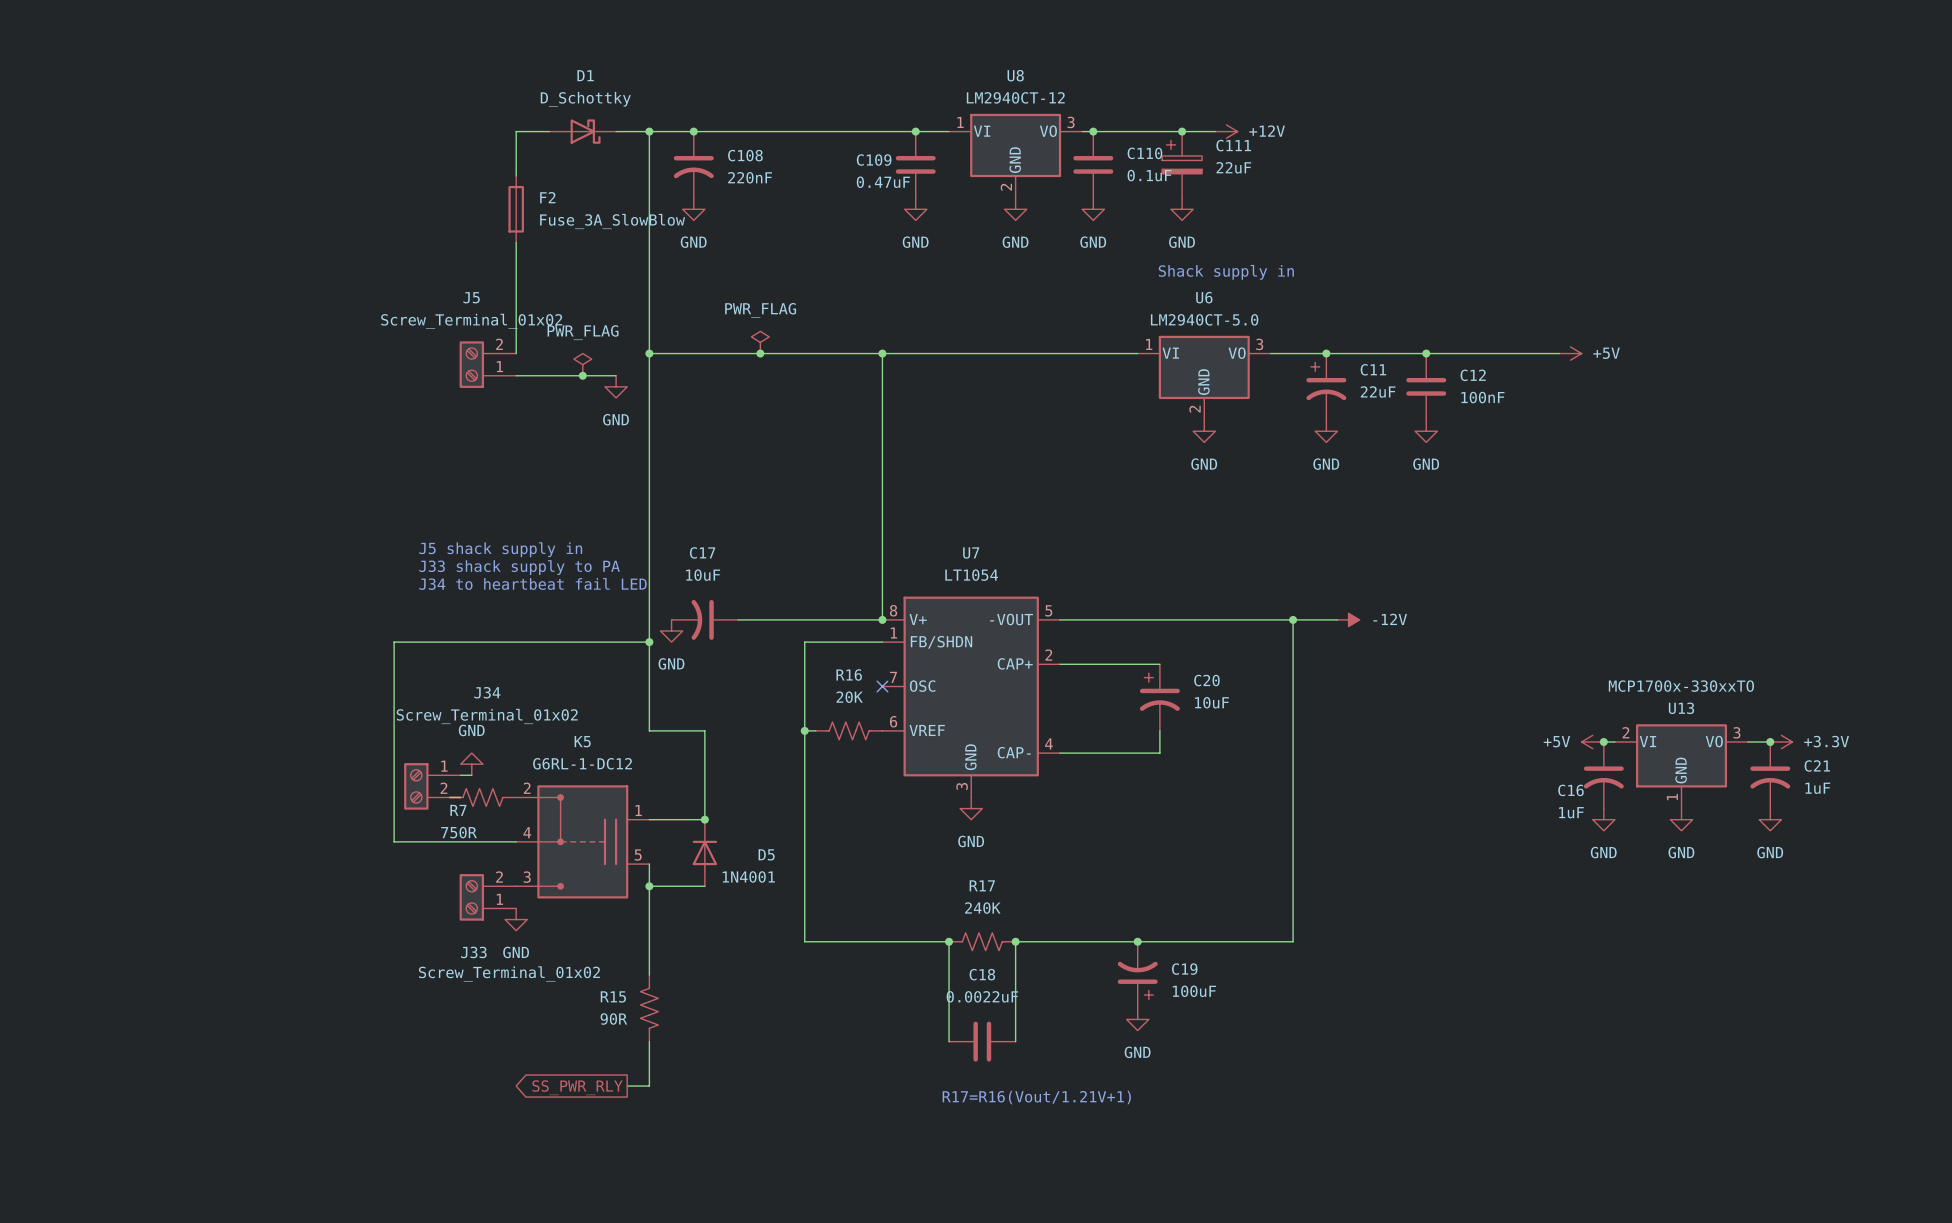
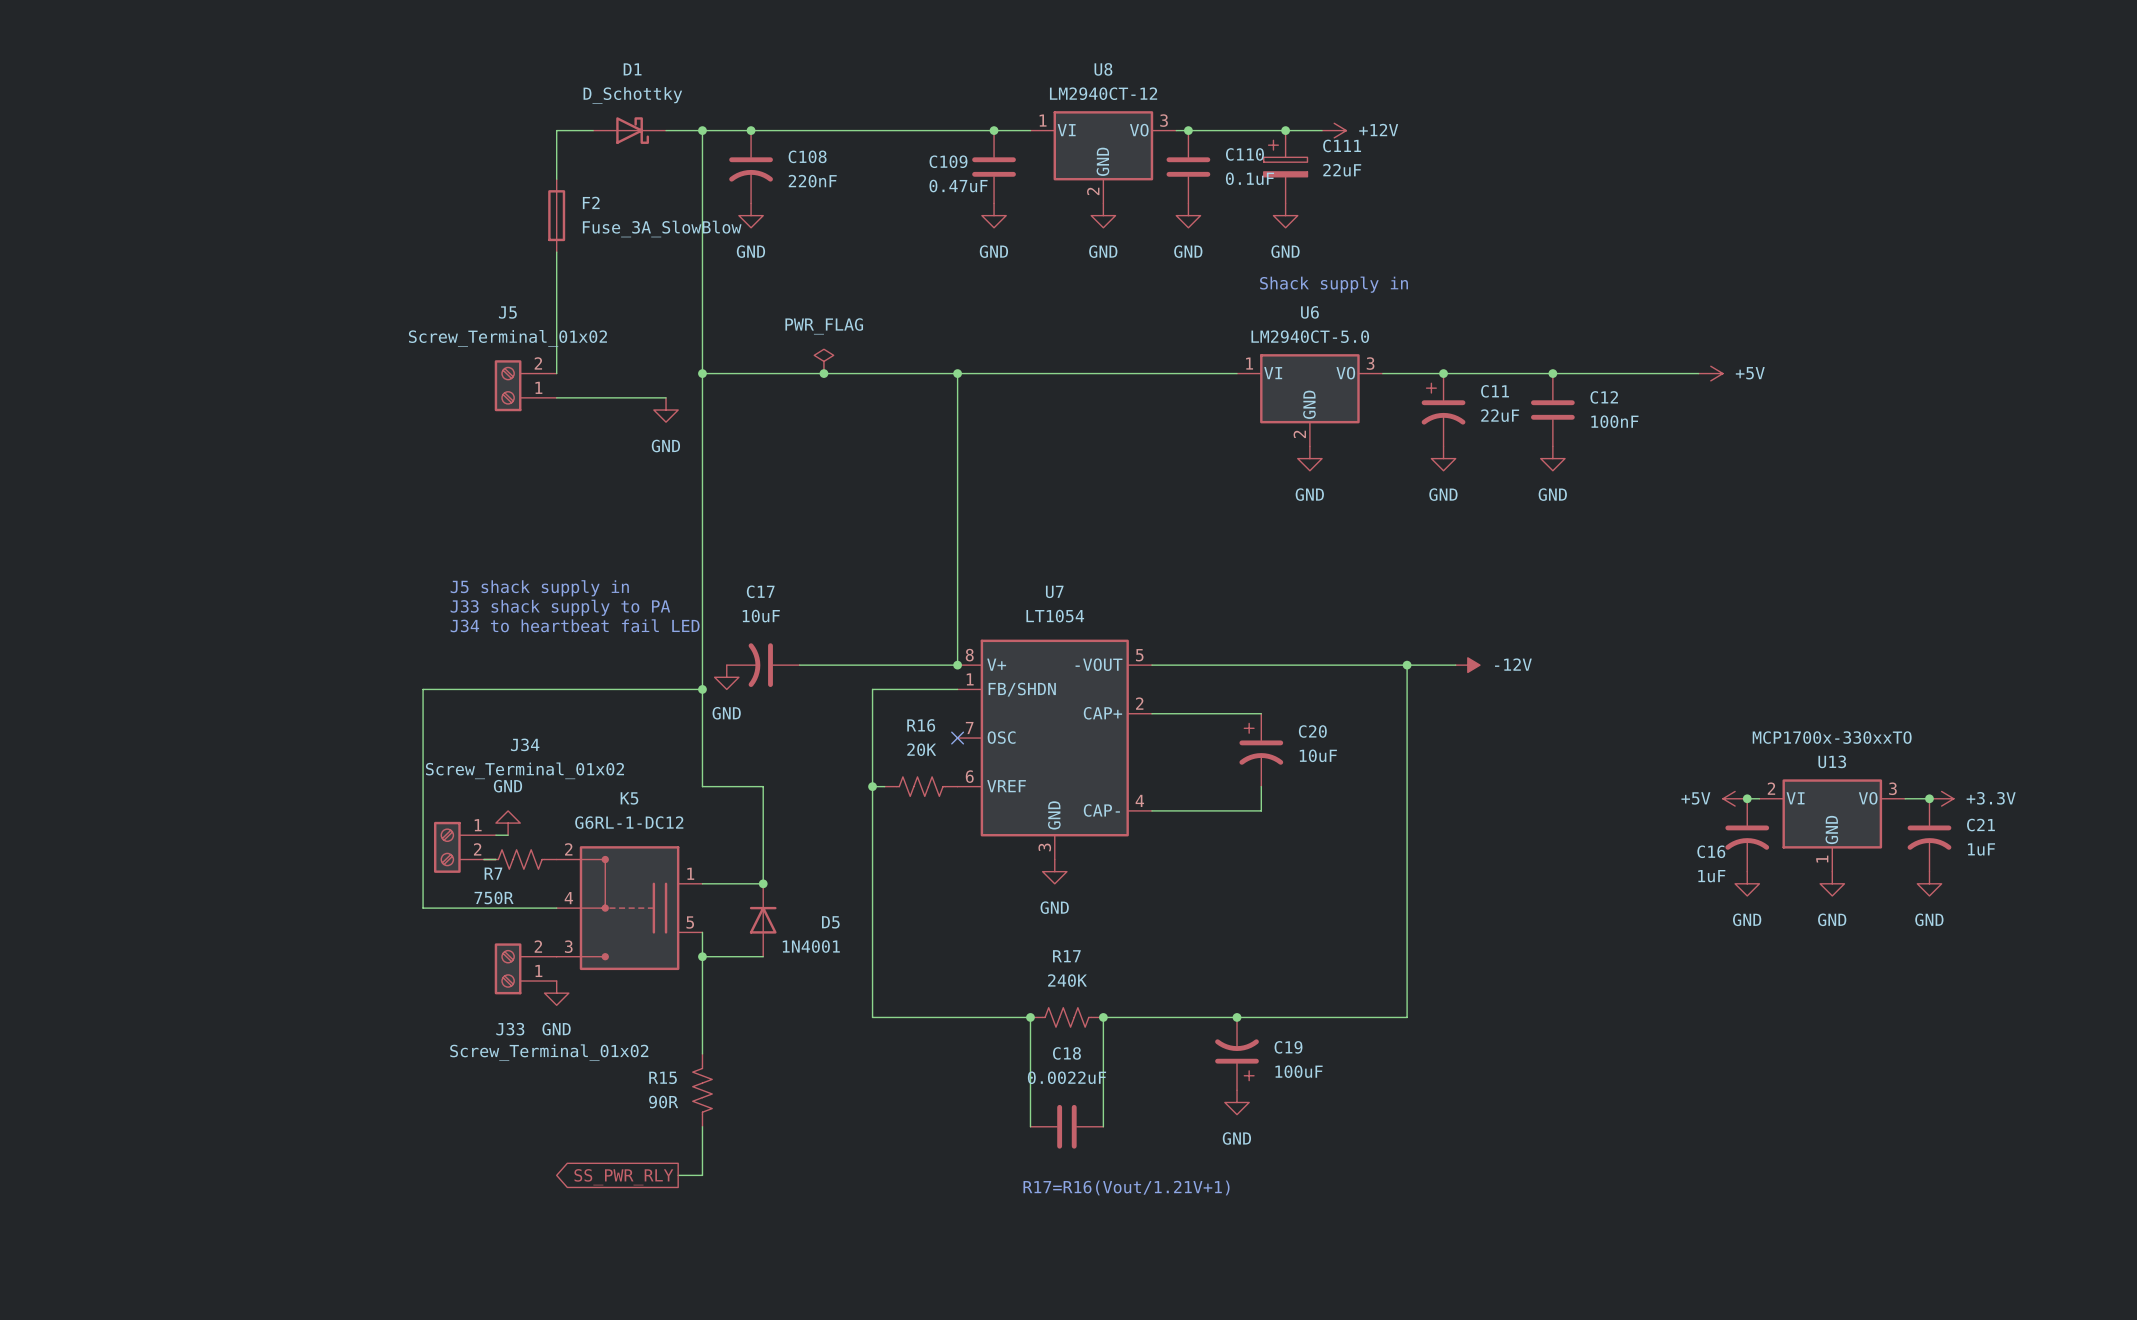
power symbol: PWR_FLAG (582, 364) -> none
junction: (582, 375) -> none

